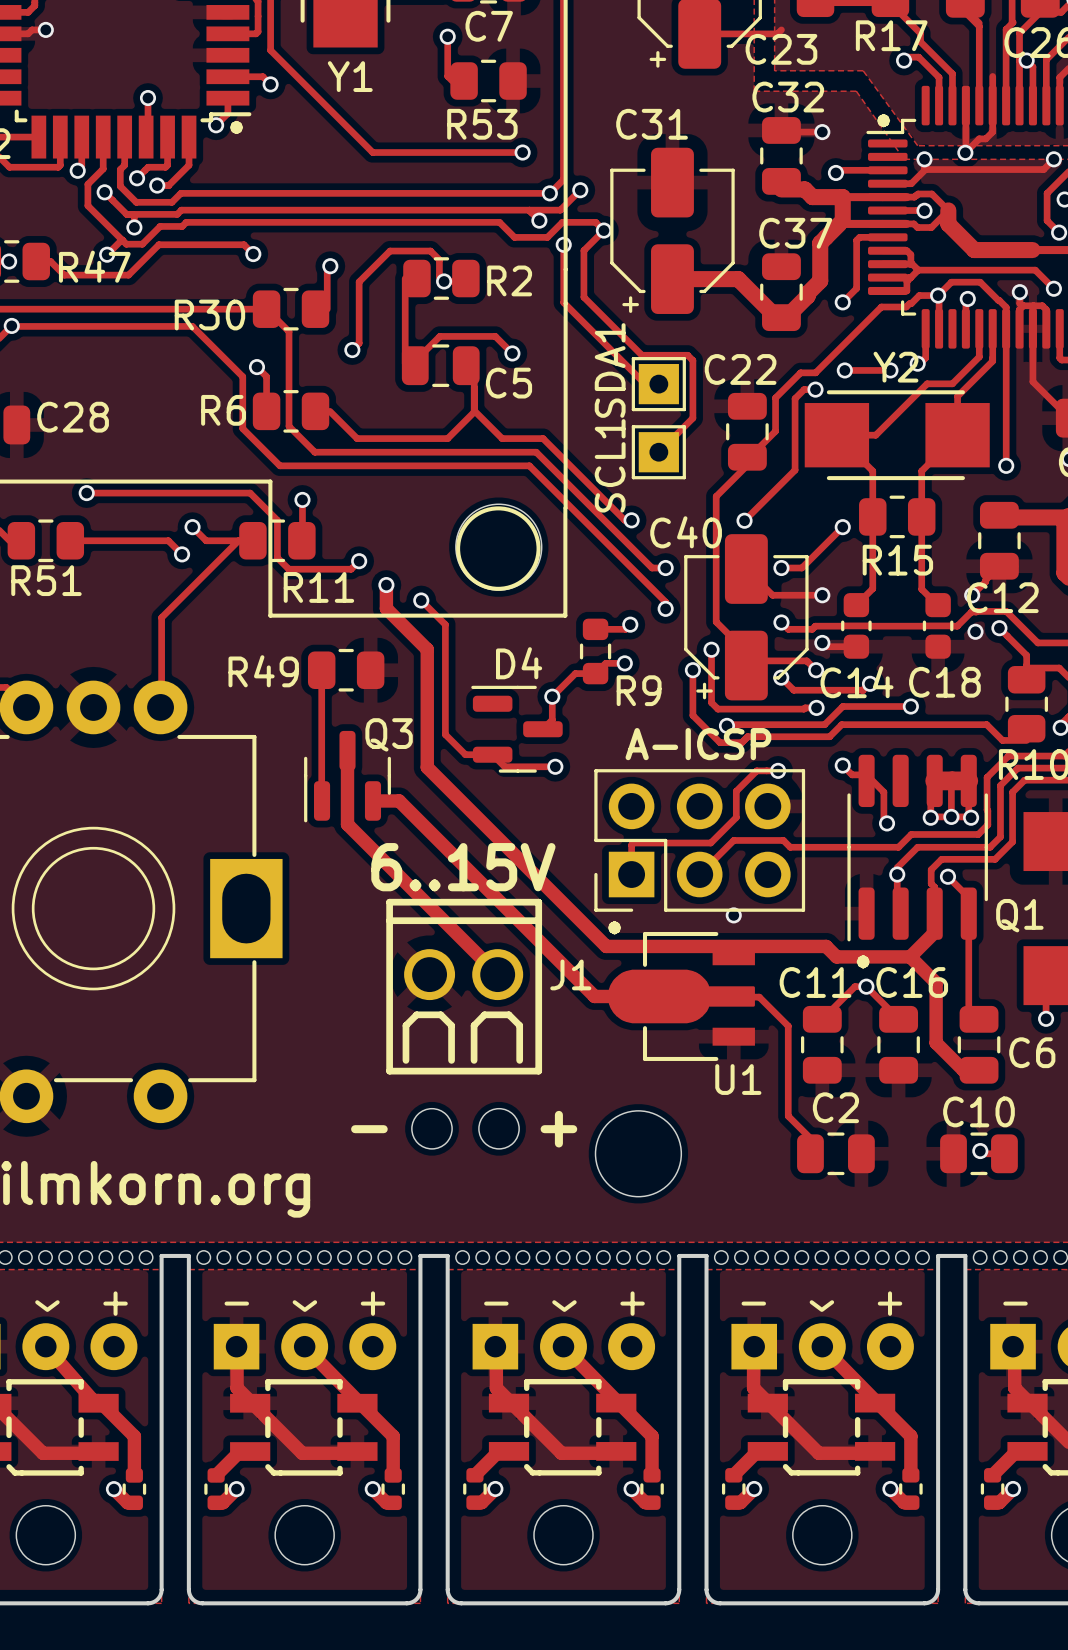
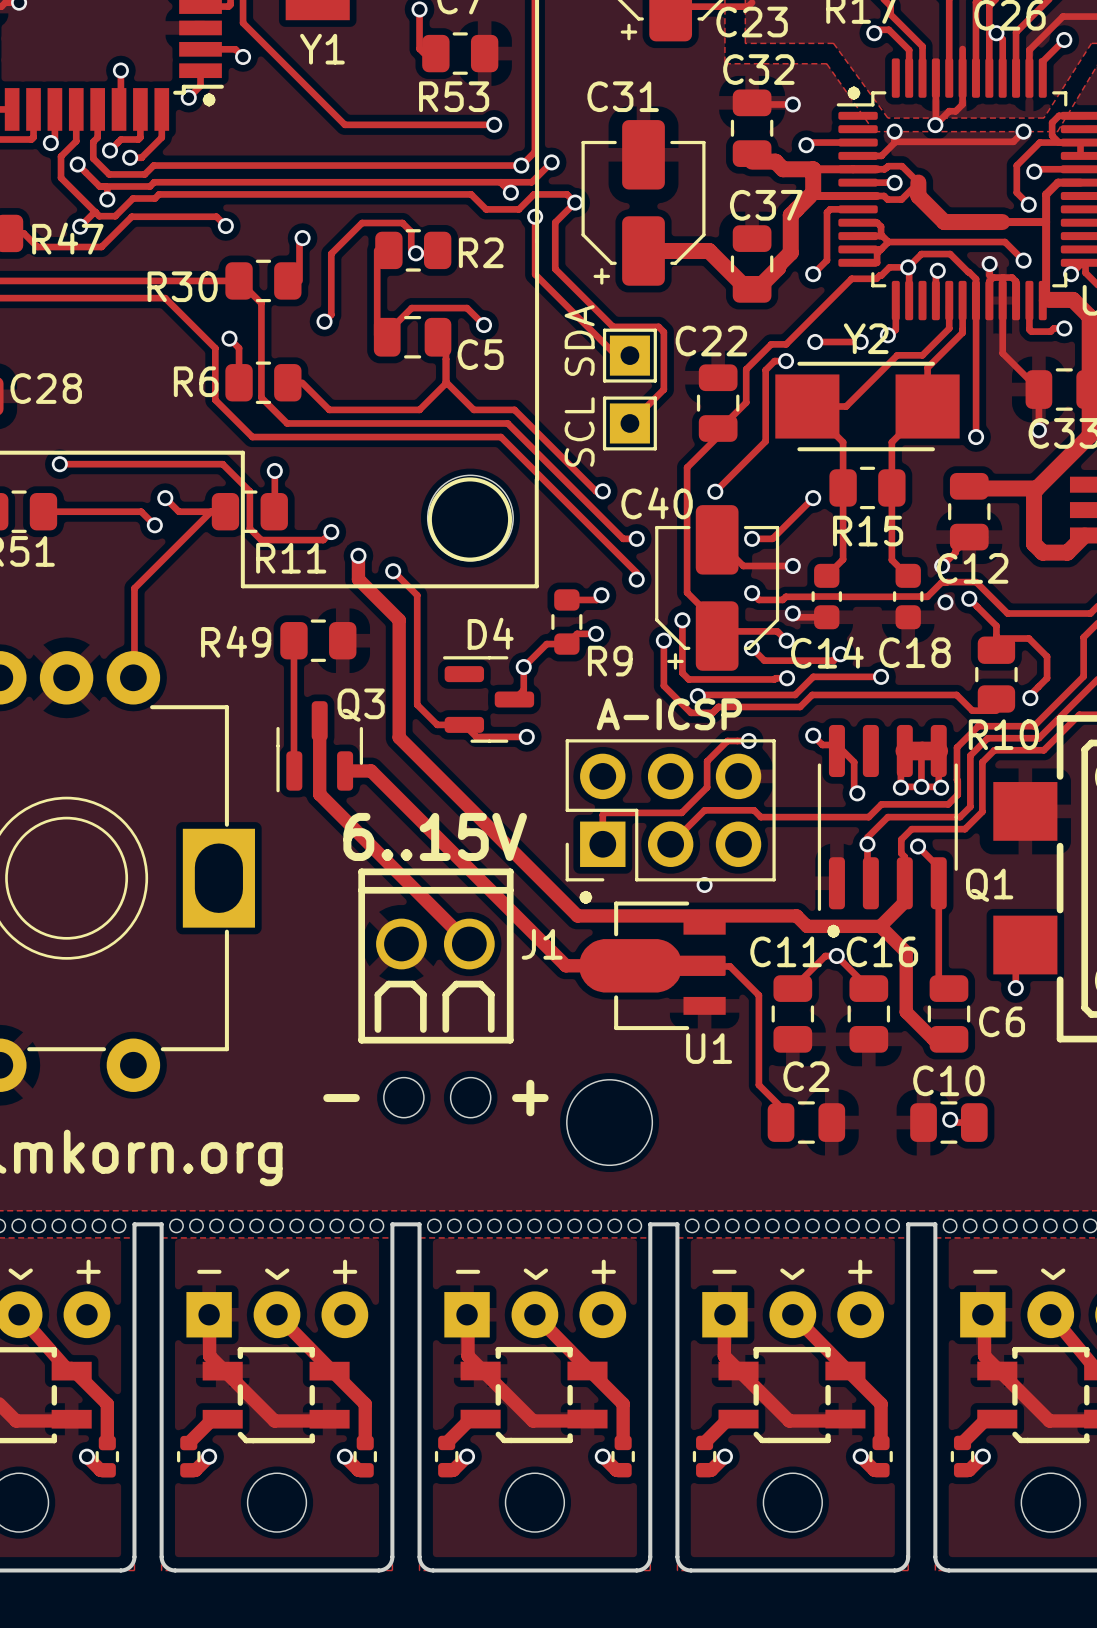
text: none -> SDA (579, 340)
SDA1 name: SDA1 (610, 370) -> none
text: none -> SCL (579, 432)
SCL1 name: SCL1 (610, 465) -> none

